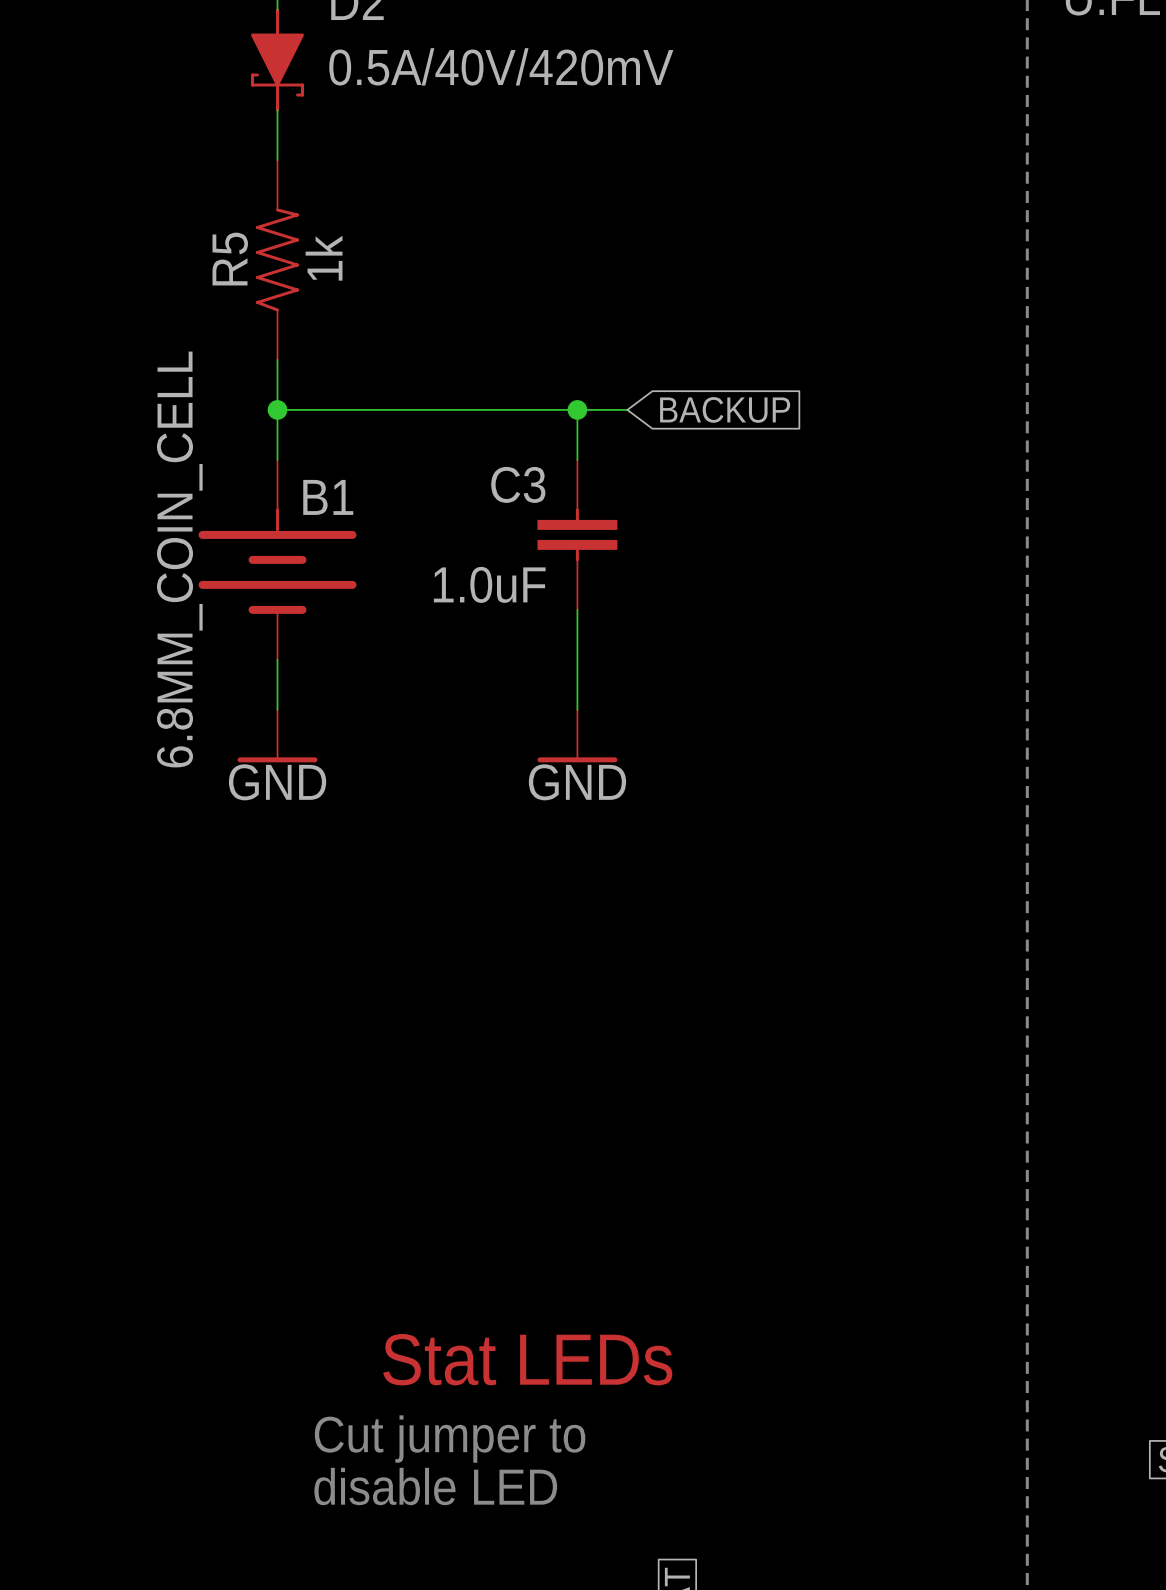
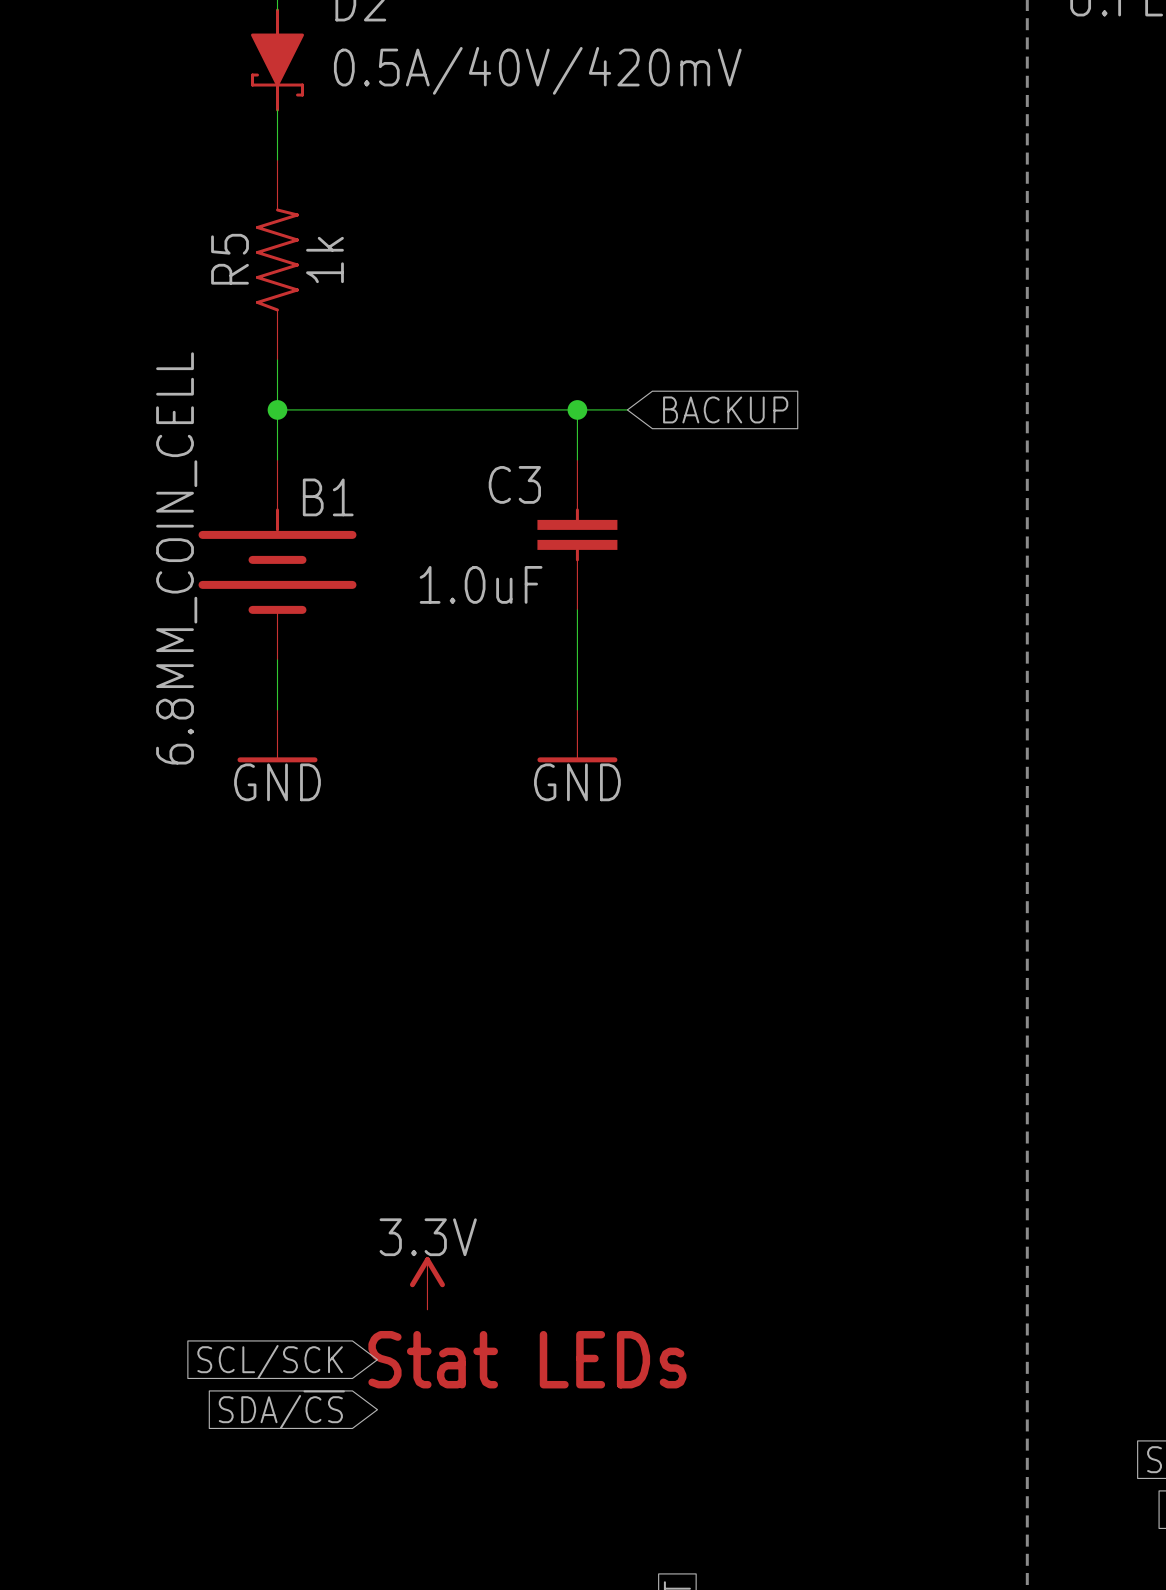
power symbol: none -> 3.3V (427, 1283)
global label: none -> SCL/SCK (270, 1362)
global label: none -> SDA/~{CS} (281, 1409)
text: Cut jumper to (450, 1439) -> none
text: disable LED (435, 1486) -> none

